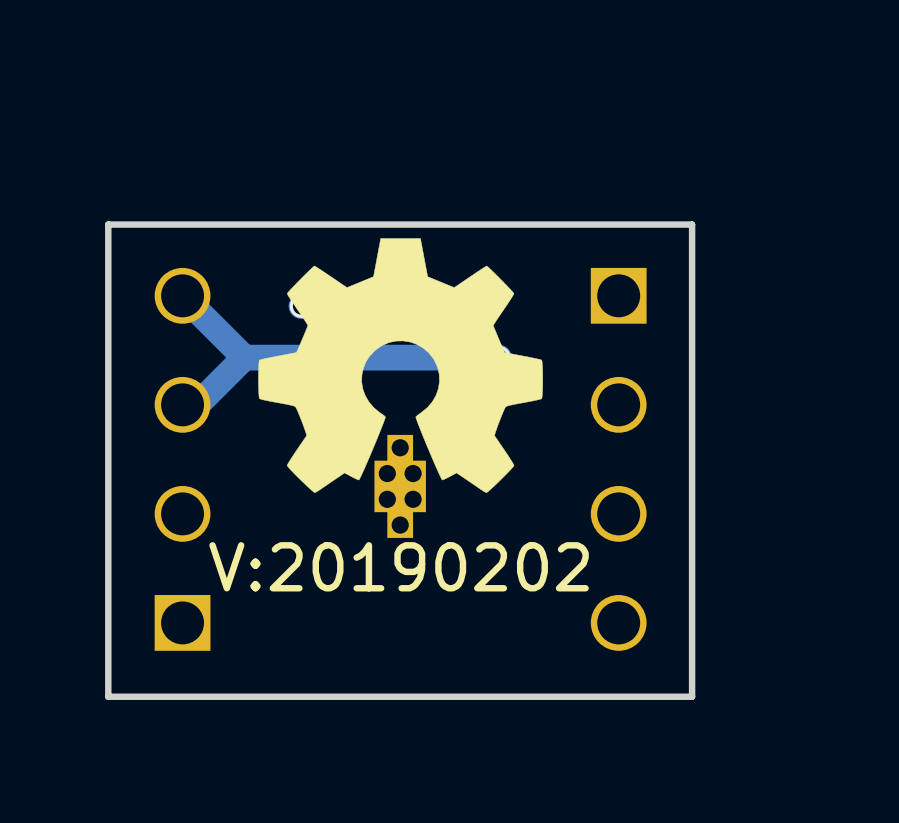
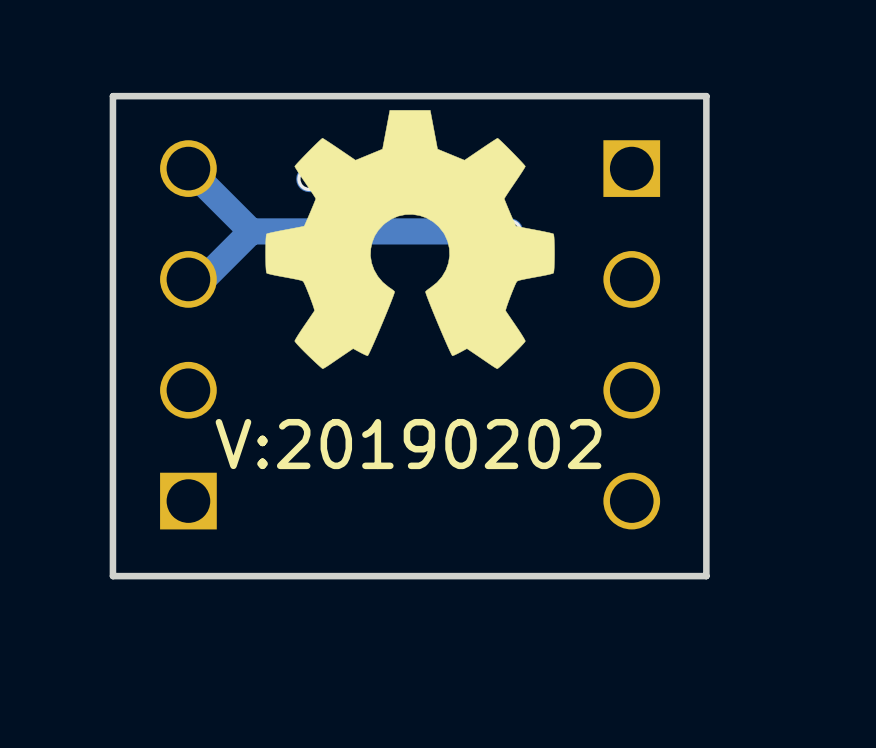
part: (400, 486) -> none

